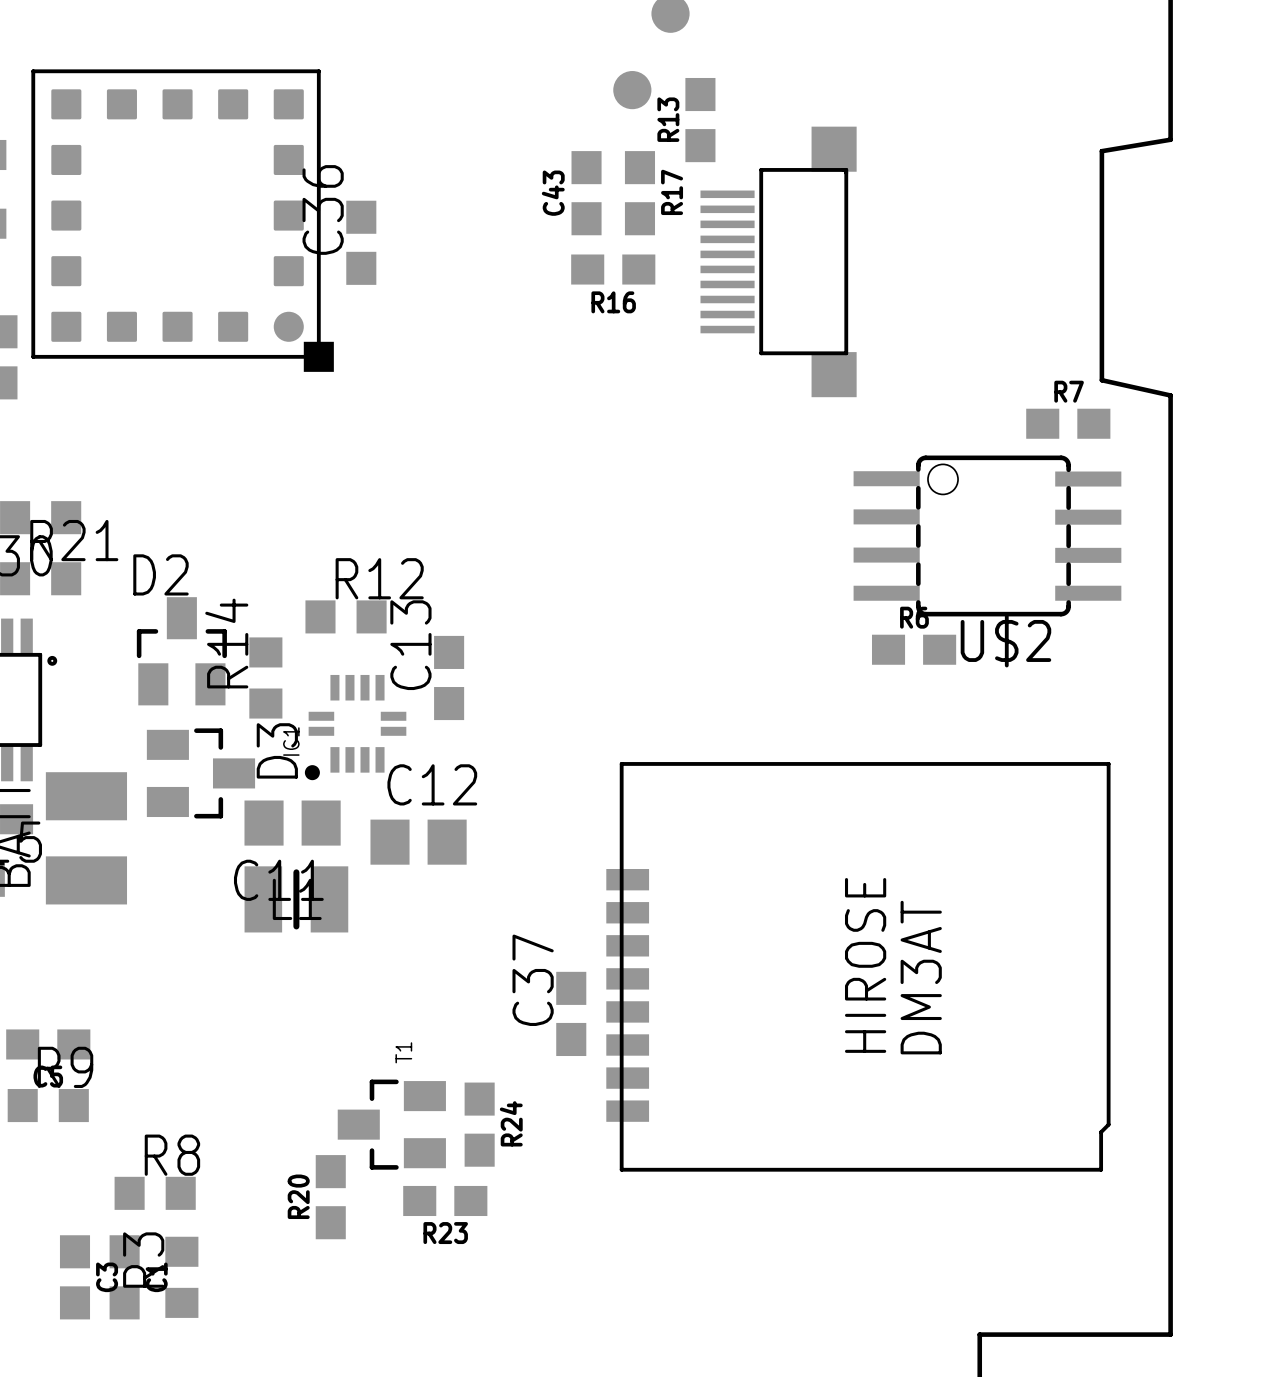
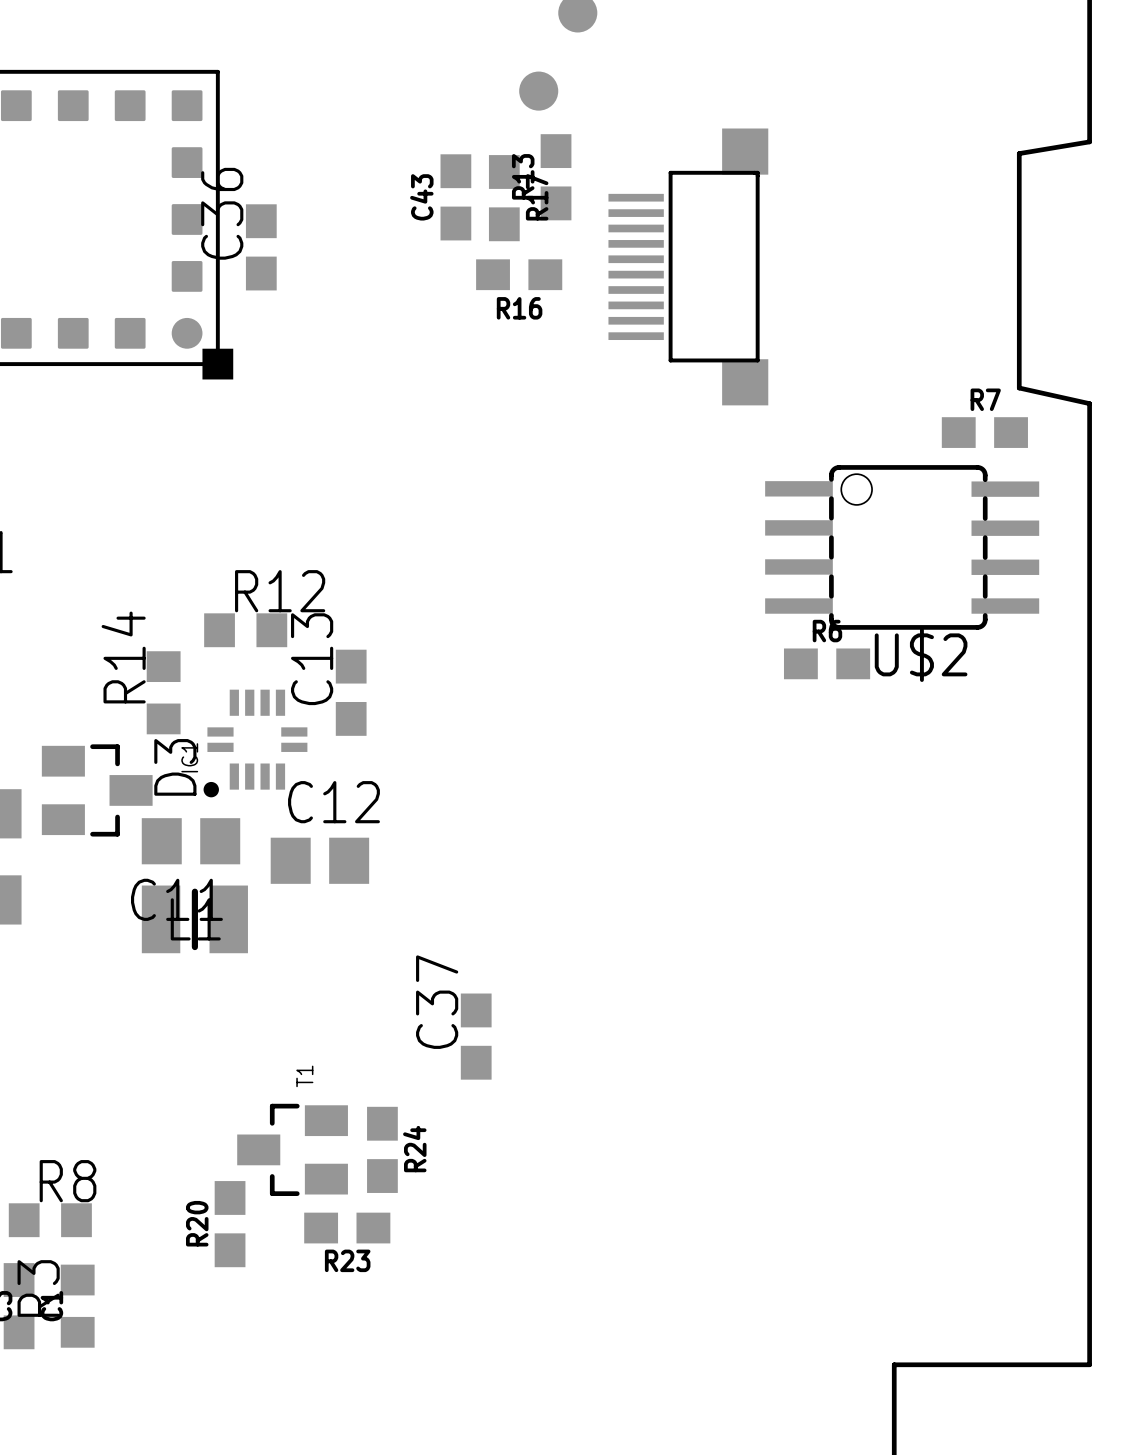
R13 position: (700, 120) -> (556, 177)
C43 position: (586, 193) -> (455, 197)
R17 position: (639, 193) -> (504, 198)
D2: (181, 651) -> none
part: (858, 966) -> none

